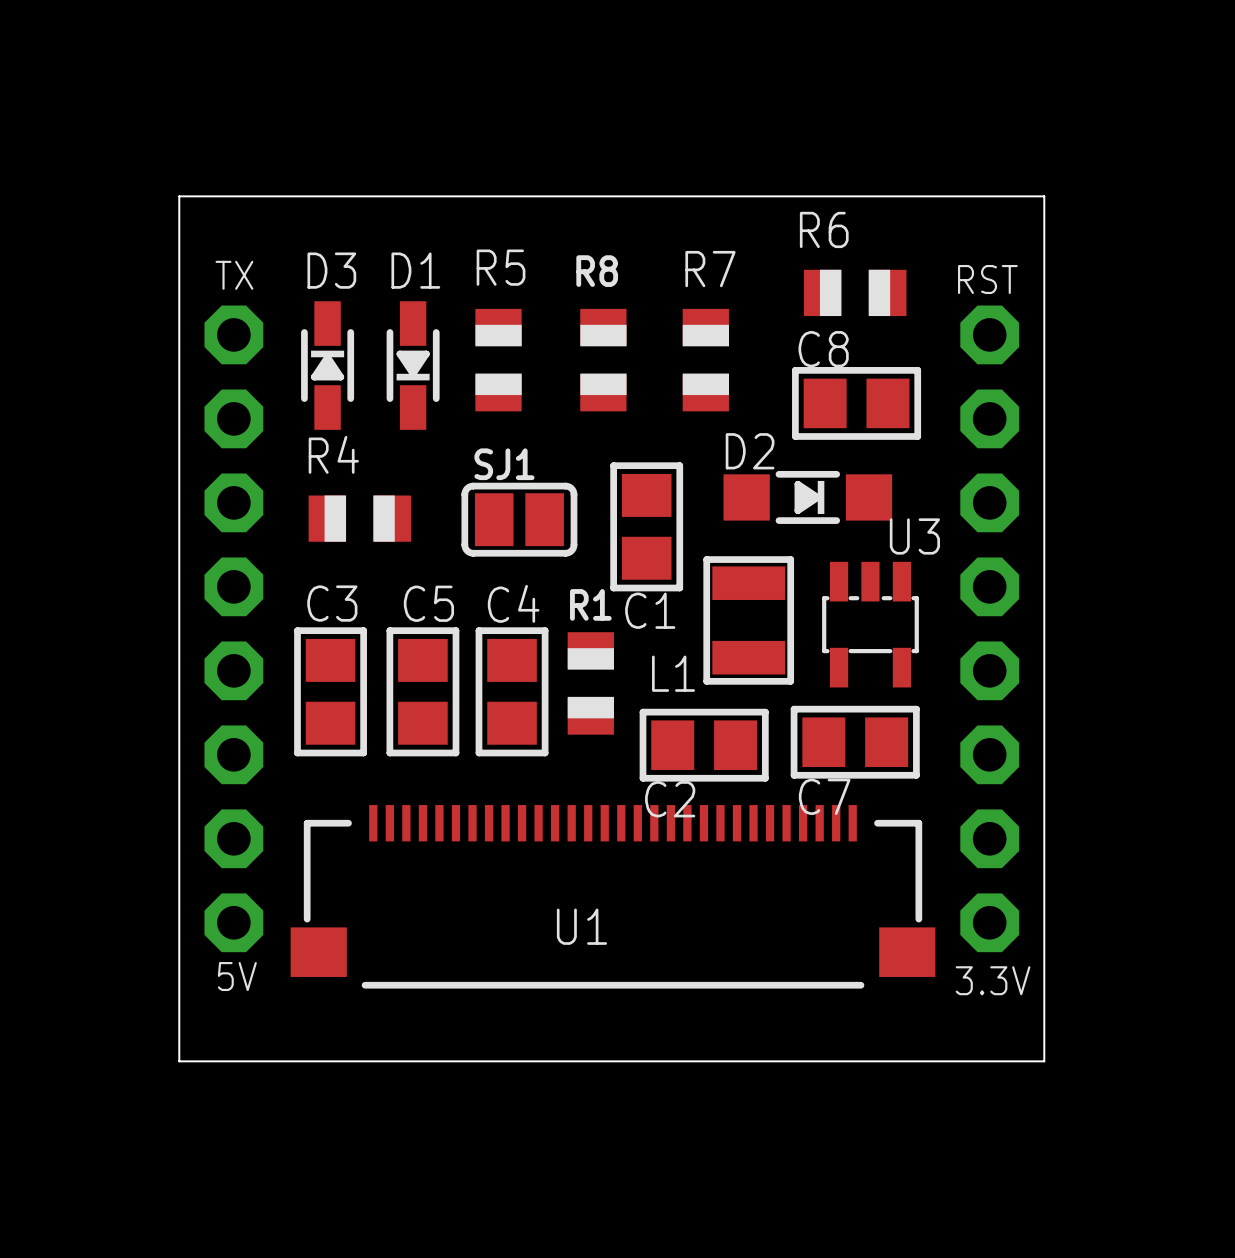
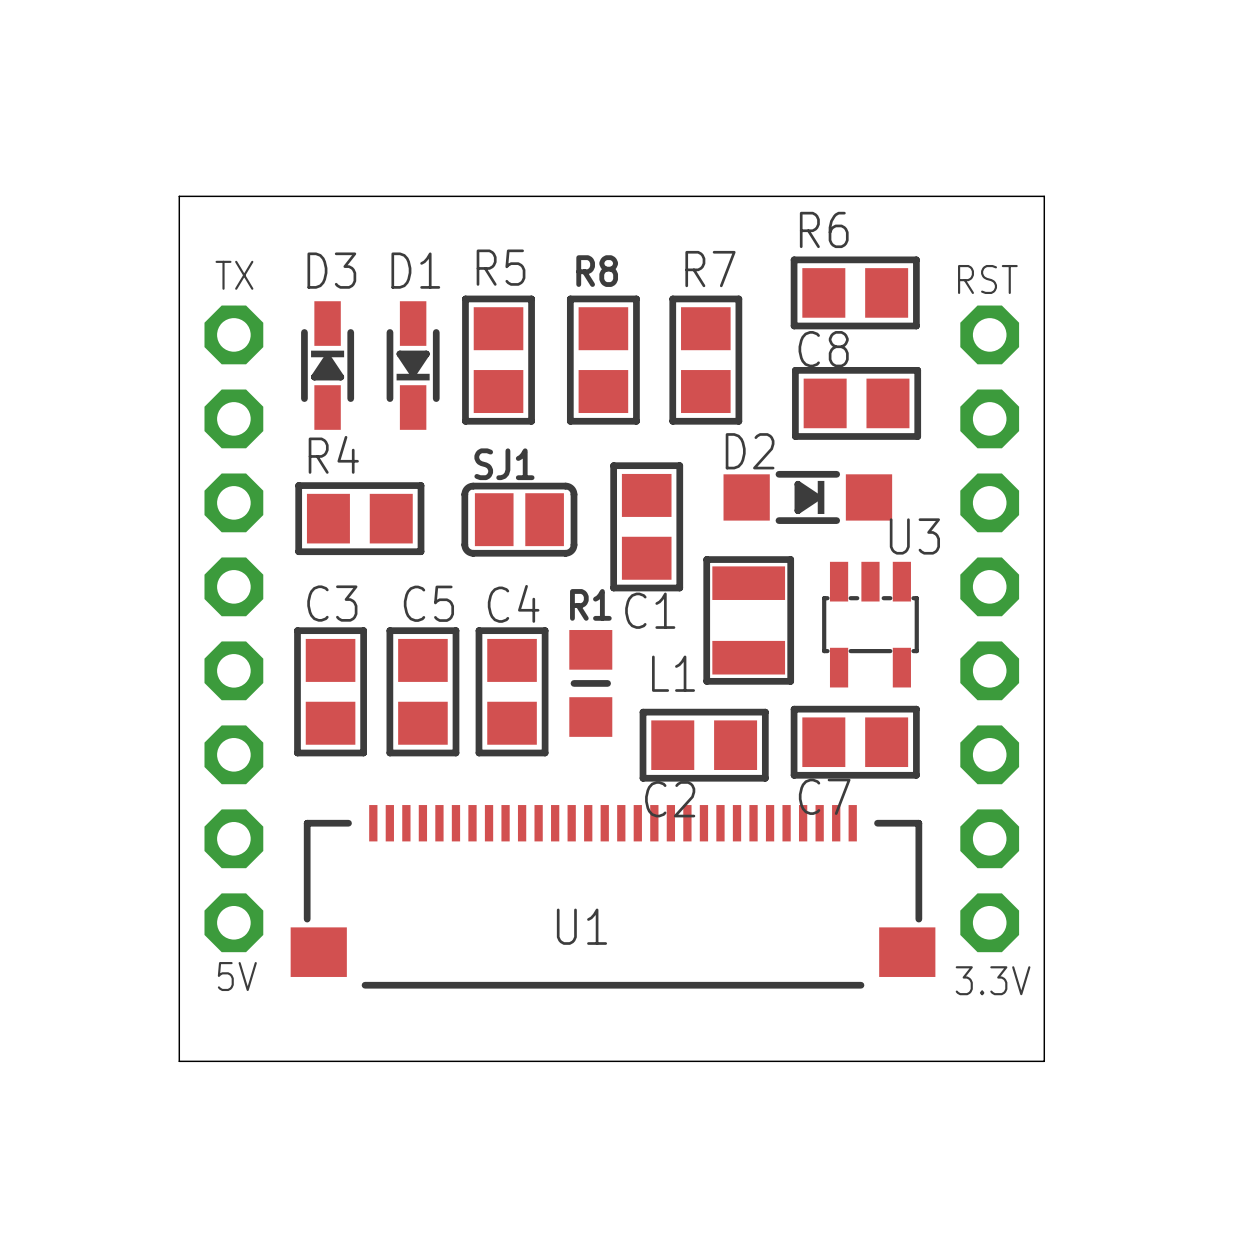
R6 footprint: [803, 269, 907, 317] -> [790, 256, 920, 330]
R5 footprint: [475, 308, 522, 412] -> [462, 295, 535, 425]
R8 footprint: [580, 308, 627, 412] -> [566, 295, 640, 425]
R7 footprint: [682, 308, 730, 412] -> [669, 295, 743, 425]
R4 footprint: [308, 495, 412, 542] -> [295, 482, 425, 556]
R1 footprint: [567, 632, 614, 735] -> [569, 630, 613, 737]

